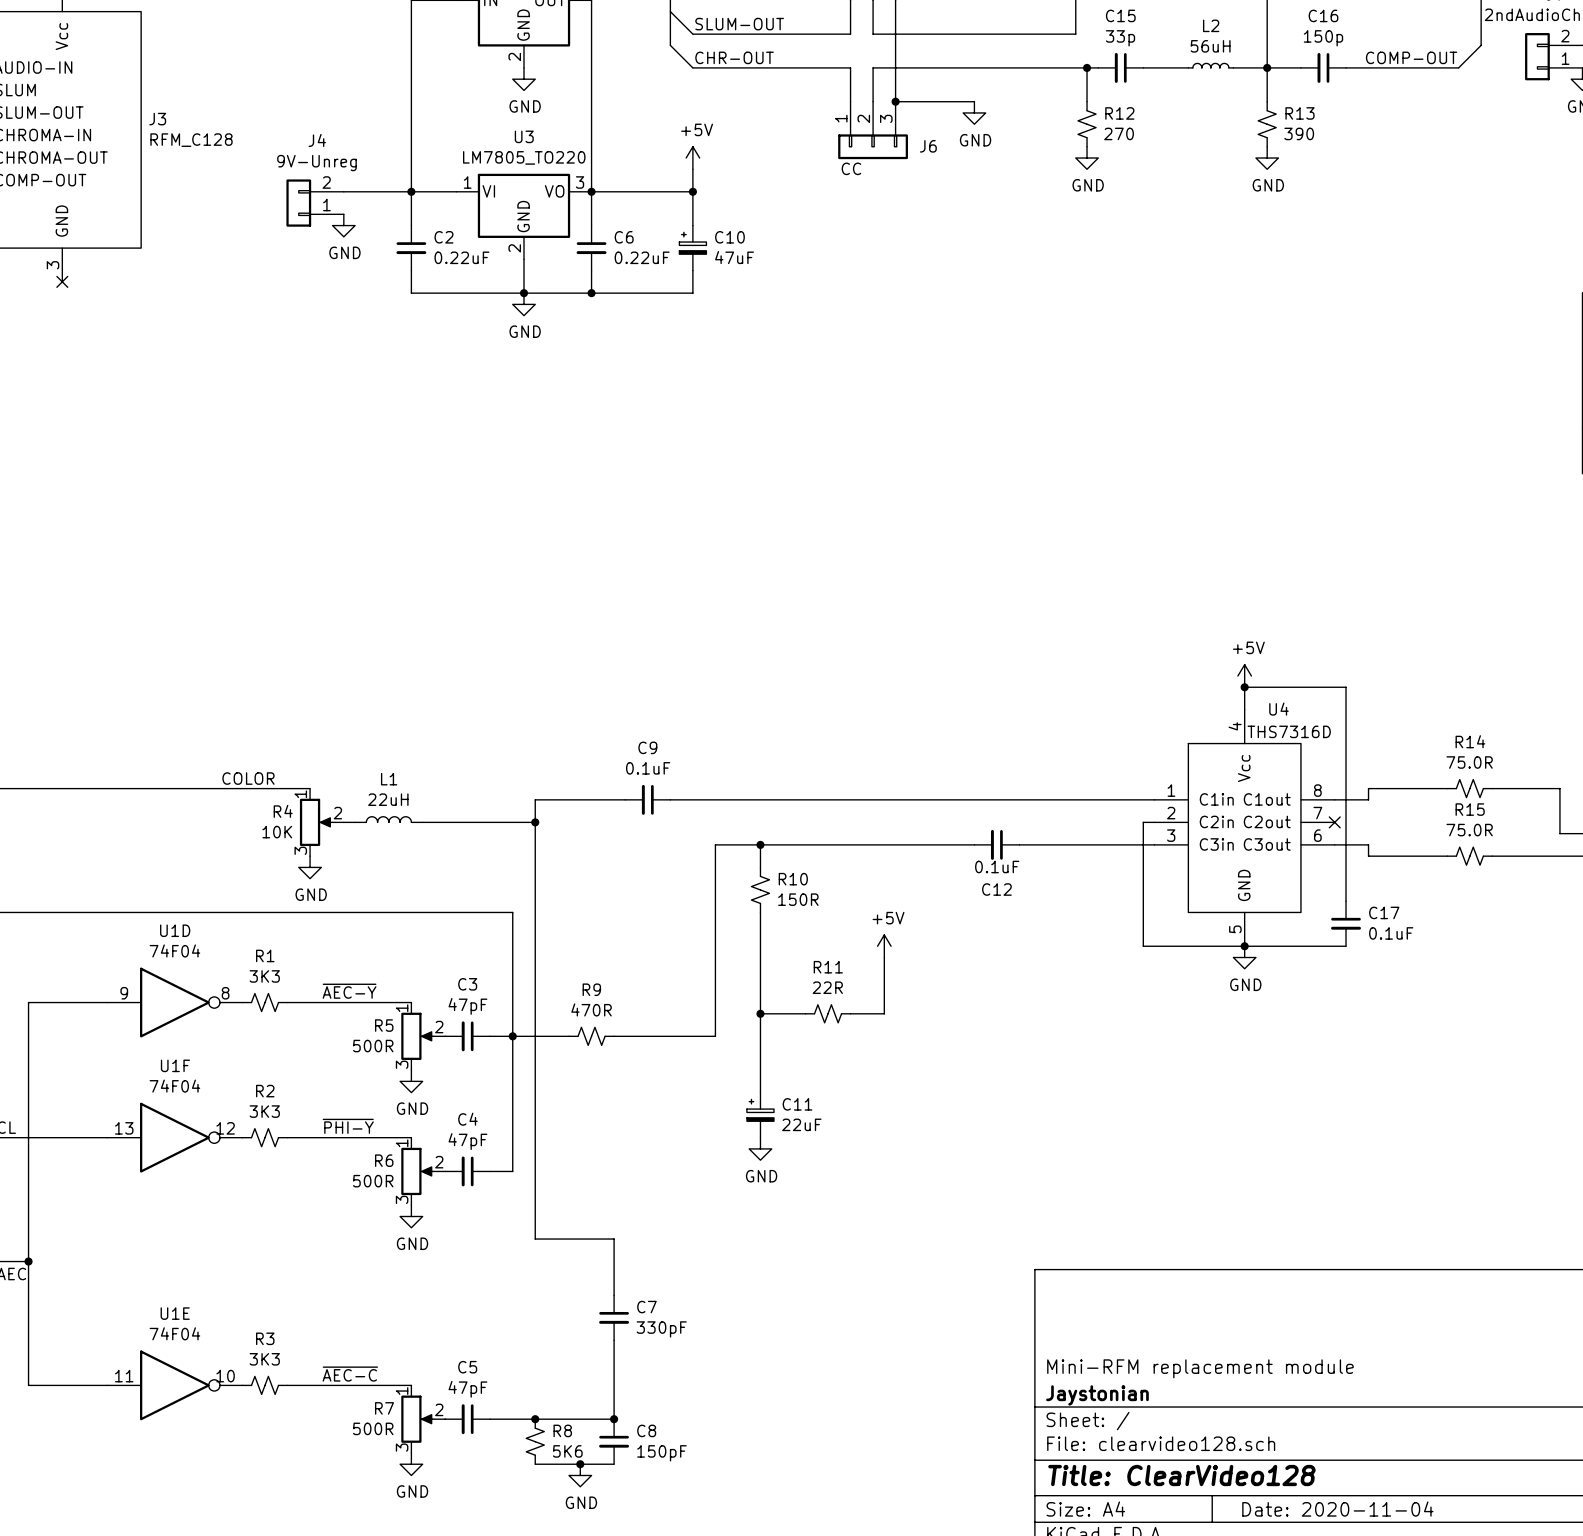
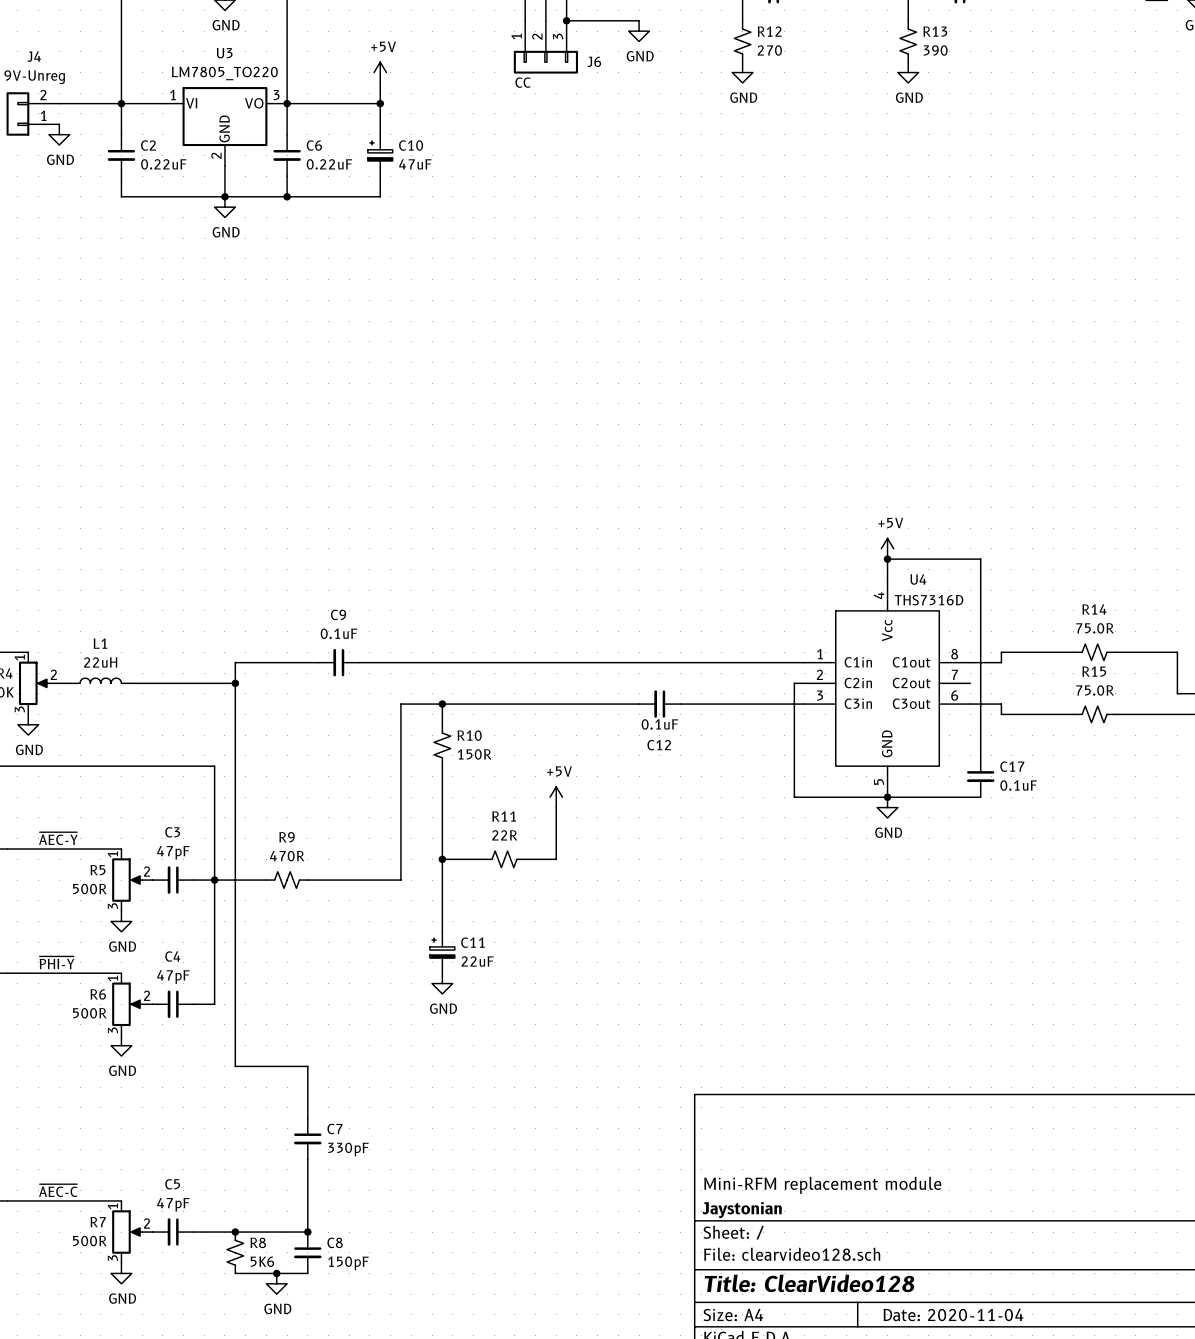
no-connect mark: (1334, 822) -> none

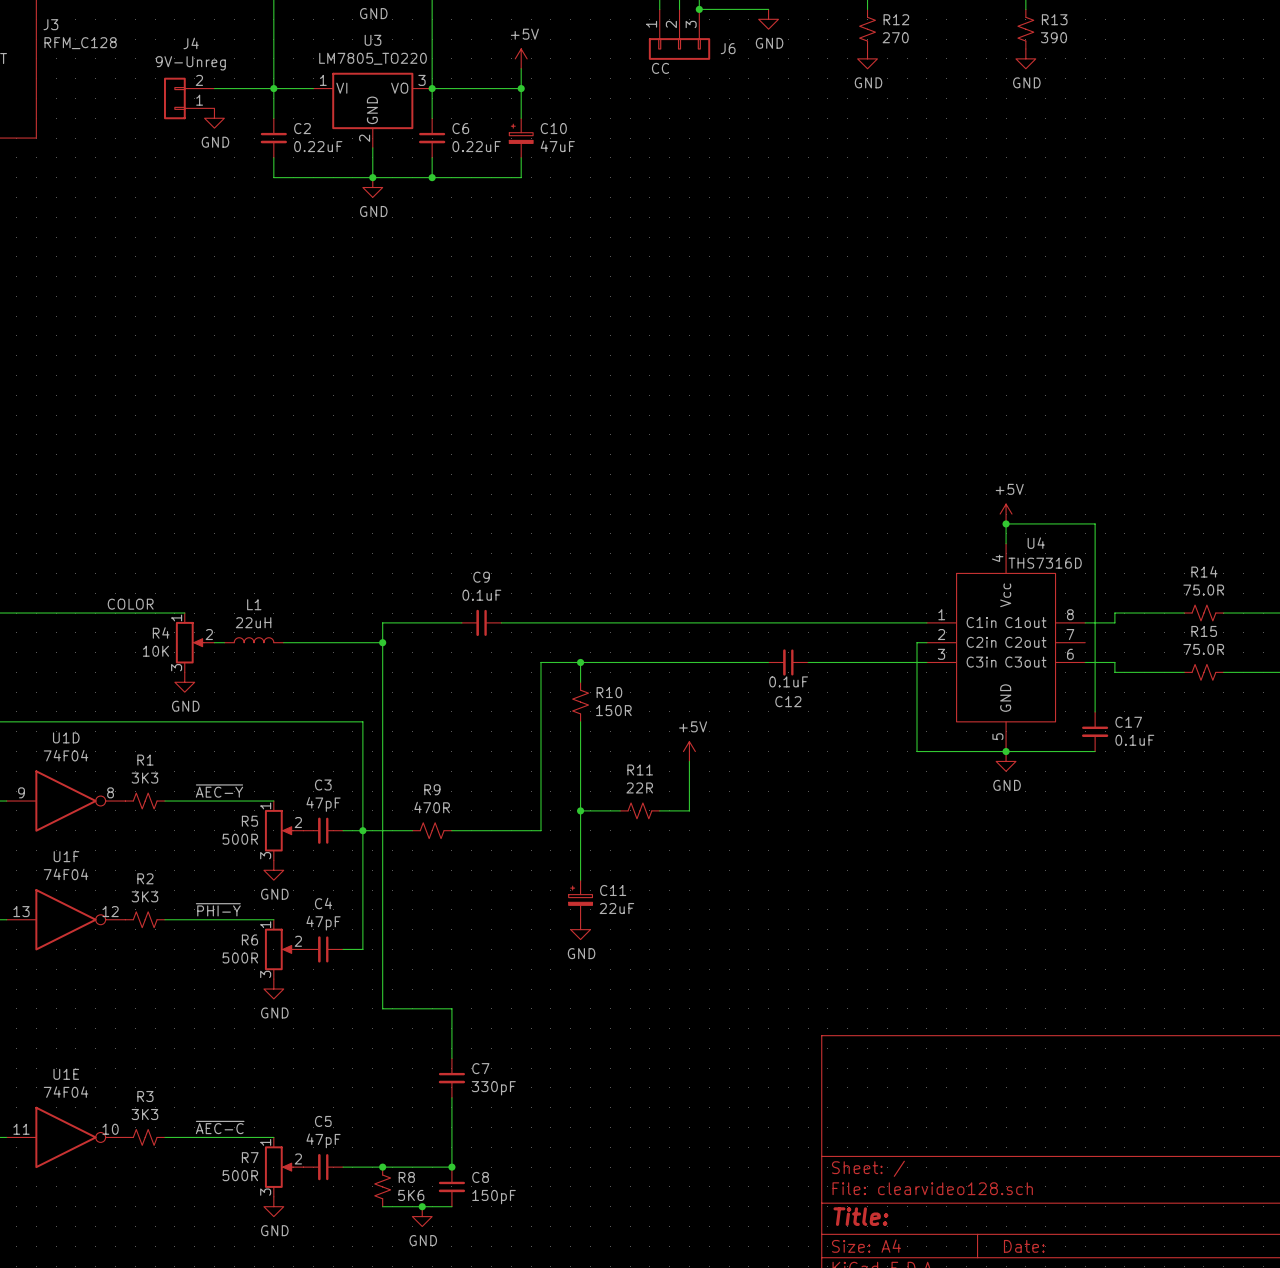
title block: Mini-RFM replacement module (822, 1185) -> none
title block: Jaystonian (742, 1210) -> none
title block: Title: ClearVideo128 (809, 1283) -> Title: (860, 1216)
title block: Date: 2020-11-04 (953, 1315) -> Date: (1024, 1246)

